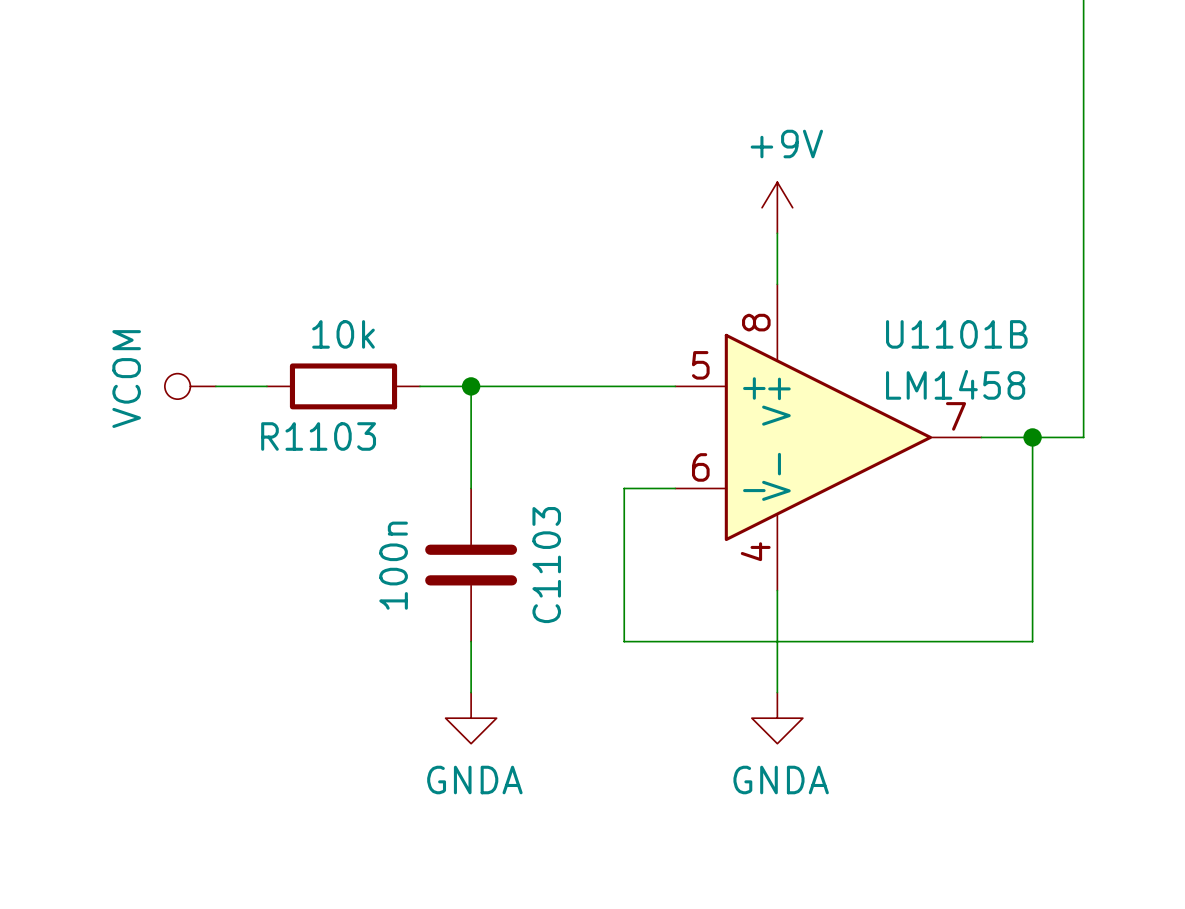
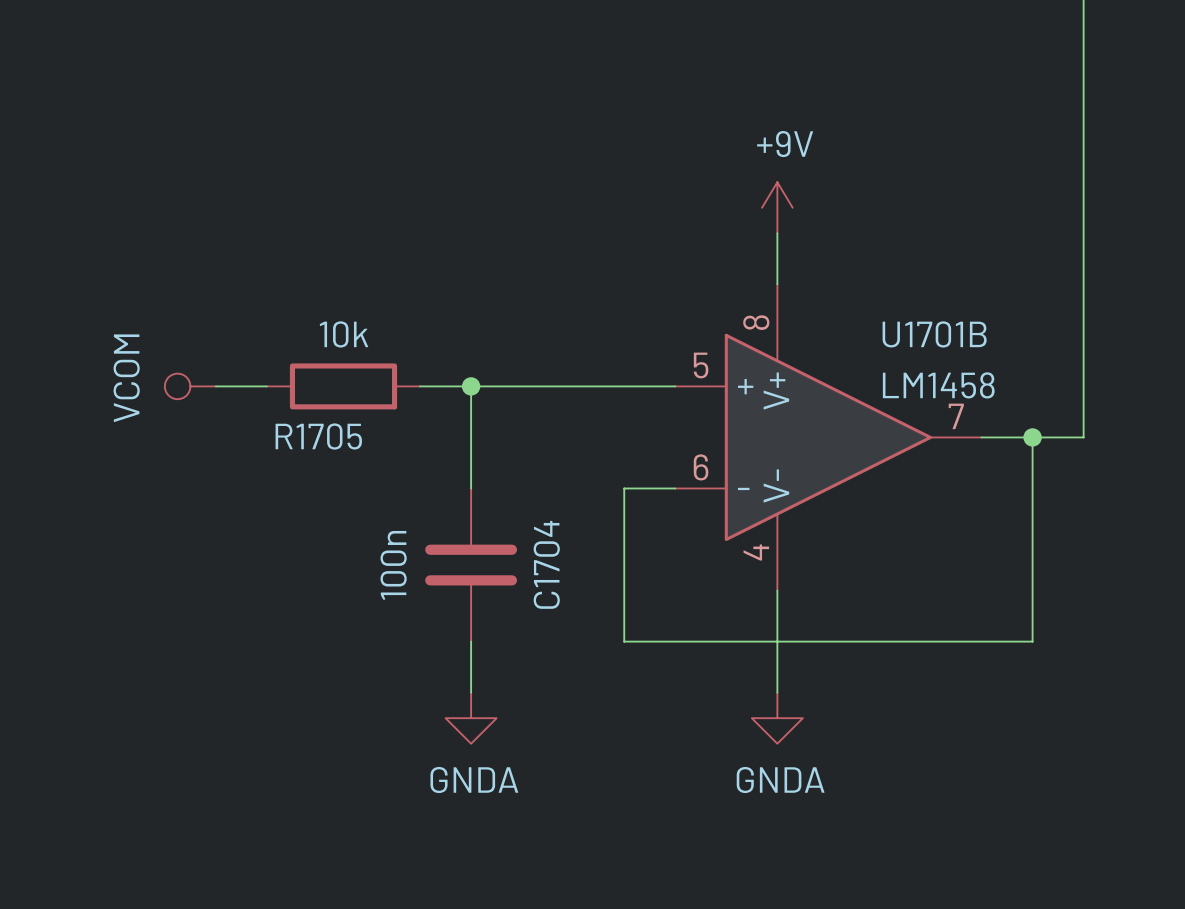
U1101B name: U1101B (956, 334) -> U1701B (934, 334)
R1103 name: R1103 (318, 436) -> R1705 (318, 436)
C1103 name: C1103 (546, 565) -> C1704 (546, 564)

